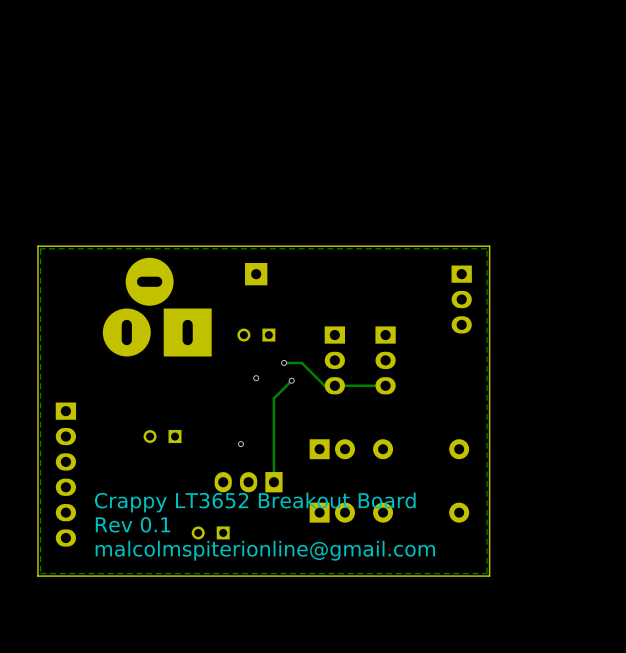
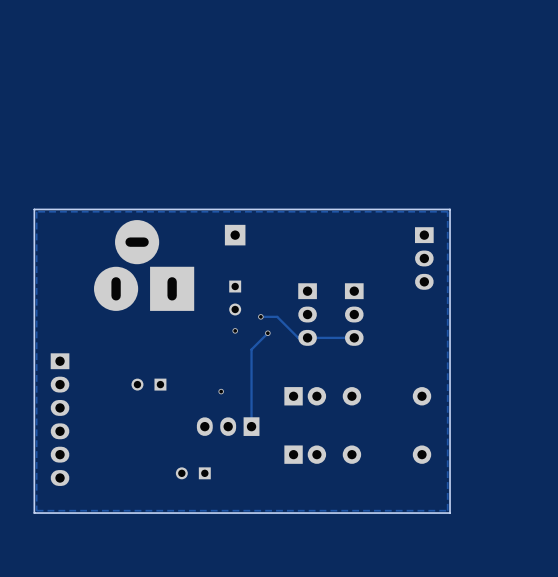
part rotation: 0° (256, 335) -> 90° counterclockwise (235, 298)
text: Crappy LT3652 Breakout Board (255, 502) -> none
text: Rev 0.1 (133, 524) -> none
text: malcolmspiterionline@gmail.com (265, 550) -> none

